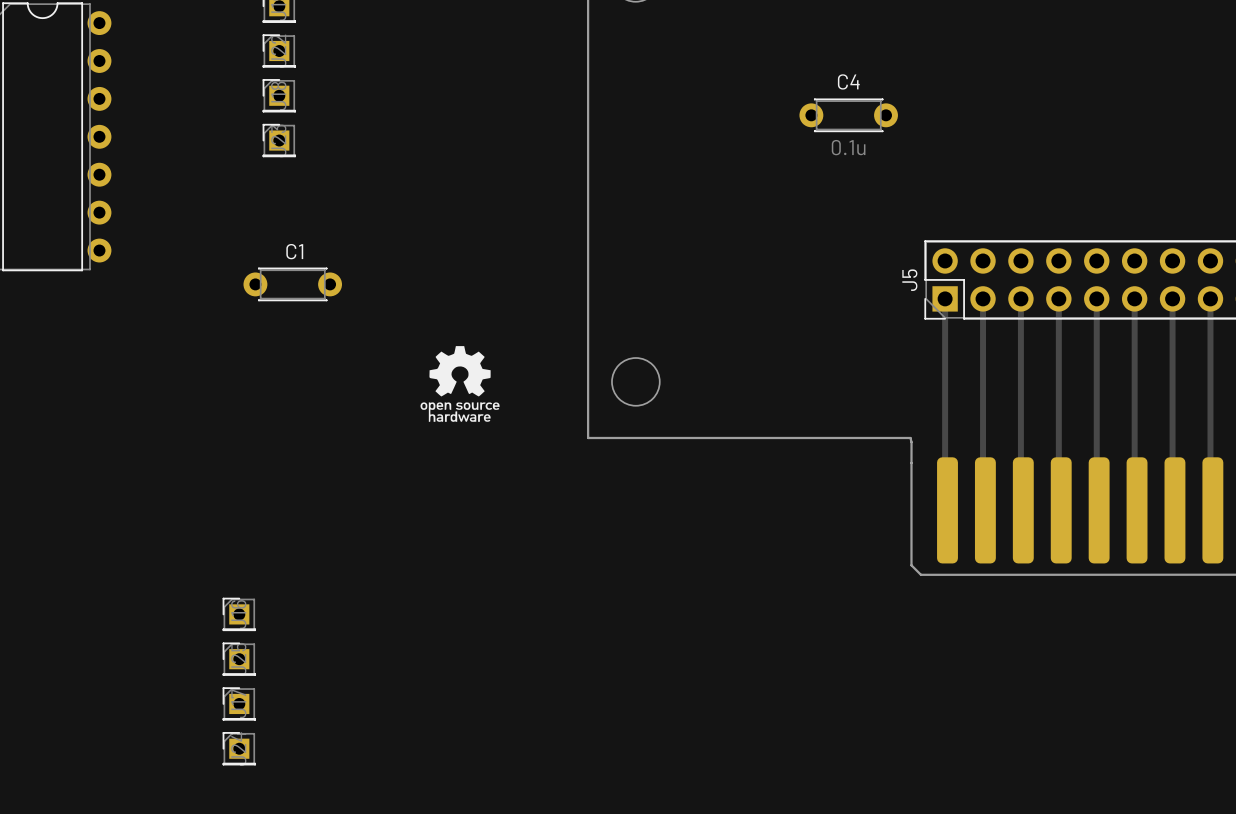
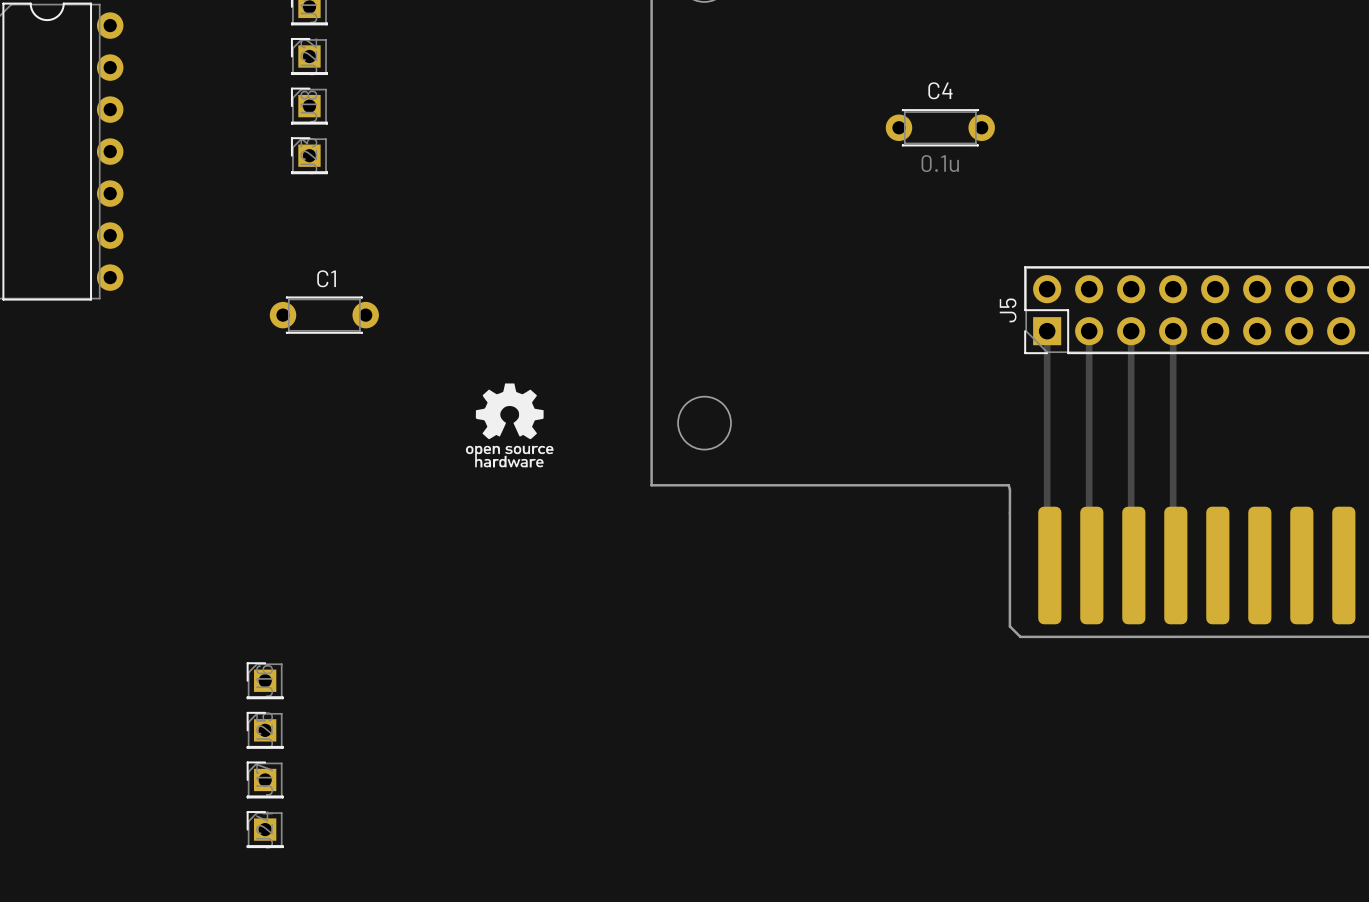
track: (1096, 298) (1096, 507) (1099, 510) -> none
track: (1134, 298) (1134, 507) (1137, 510) -> none
track: (1172, 298) (1172, 507) (1174, 510) -> none
track: (1210, 298) (1210, 507) (1212, 510) -> none

